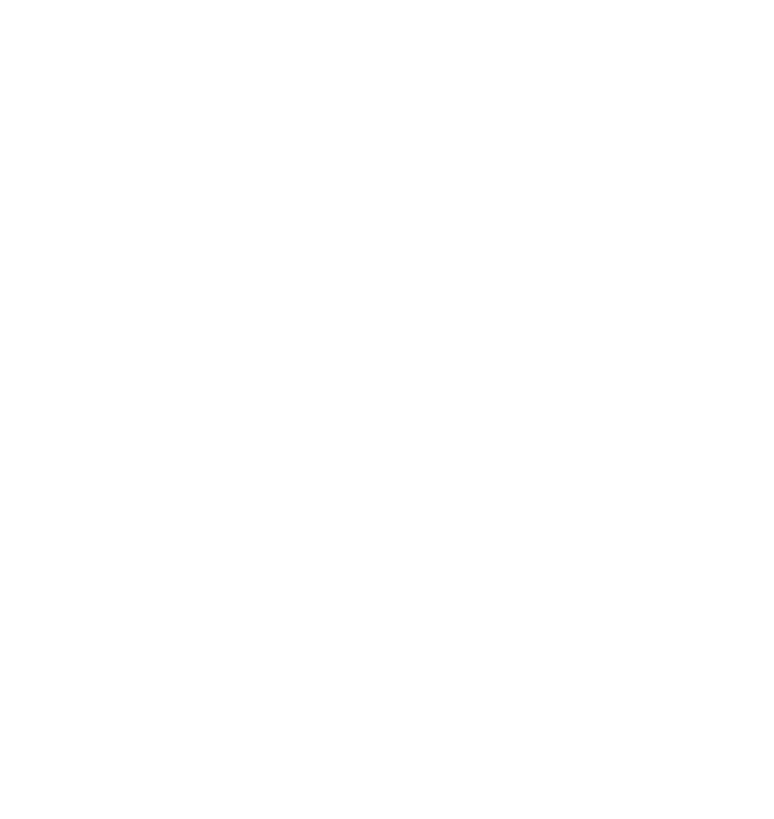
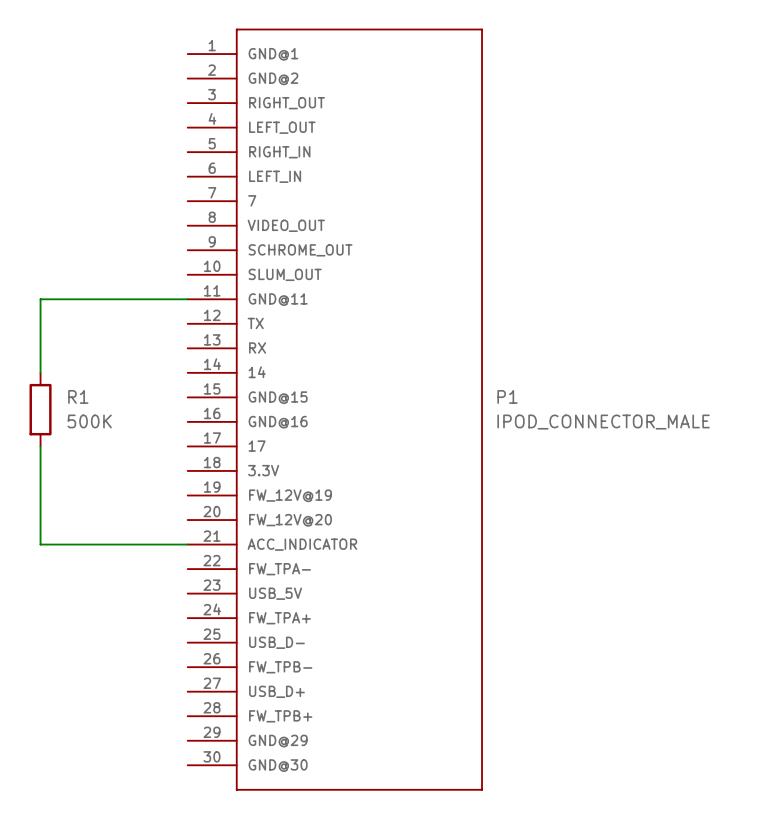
wire: none -> (187, 299) (40, 299) (40, 372)
R1: none -> 500K (40, 409)
P1: none -> IPOD_CONNECTOR_MALE (334, 409)
wire: none -> (40, 446) (40, 544) (187, 544)

